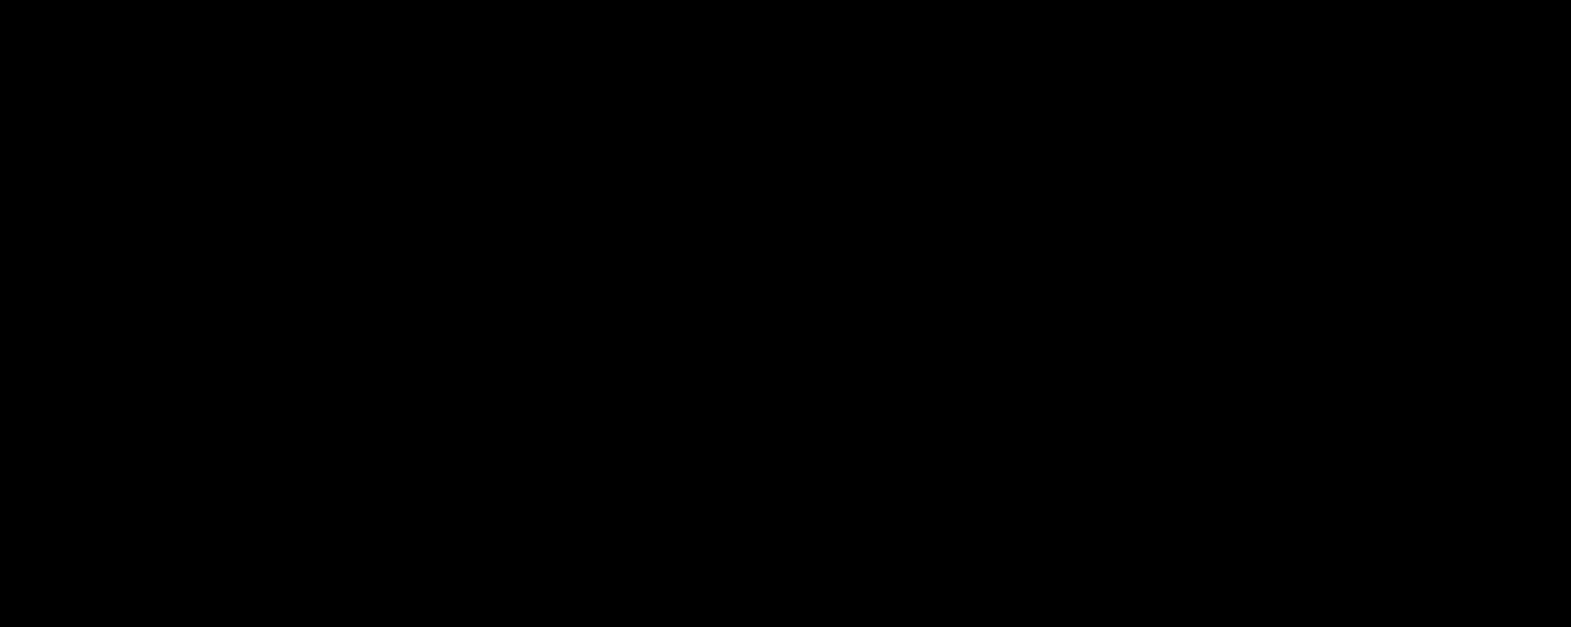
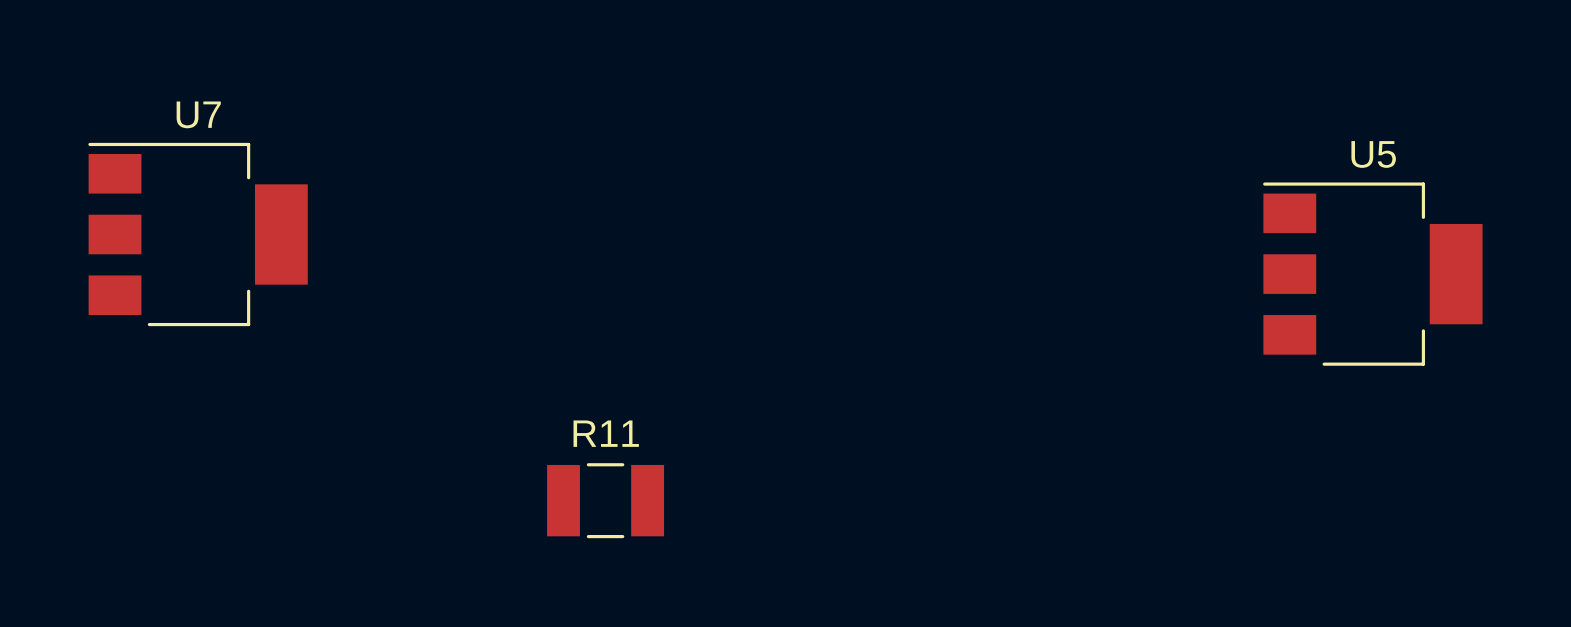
U7: none -> (198, 234)
U5: none -> (1372, 274)
R11: none -> (605, 500)

